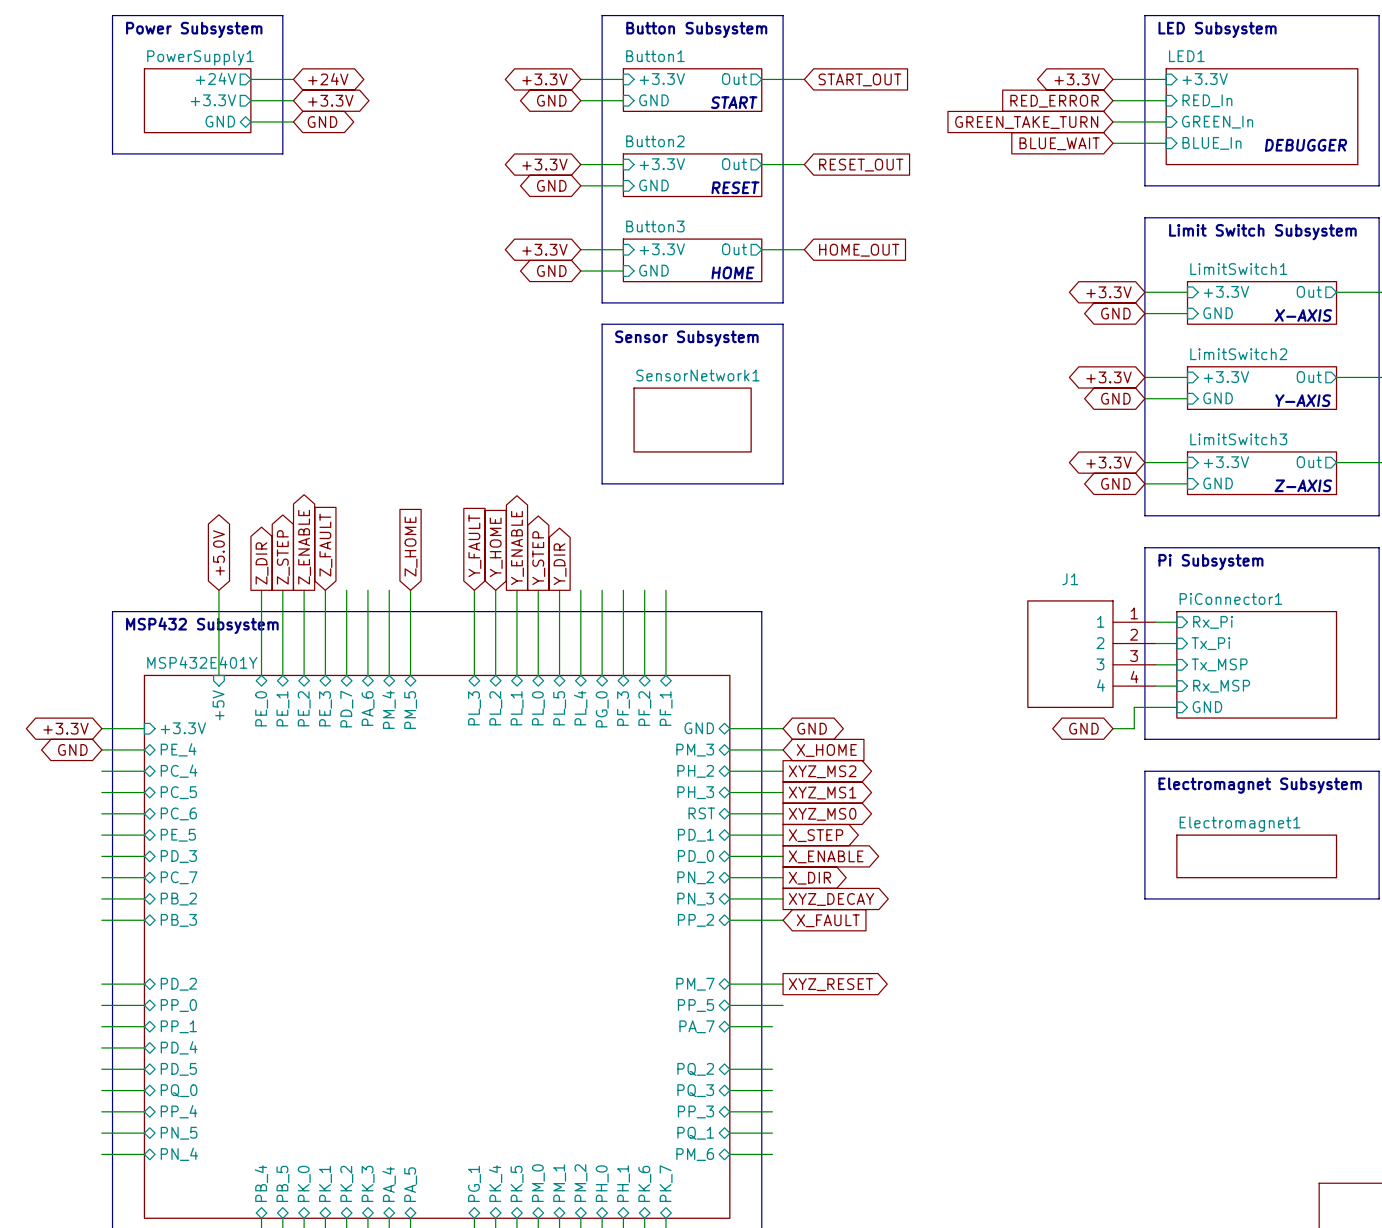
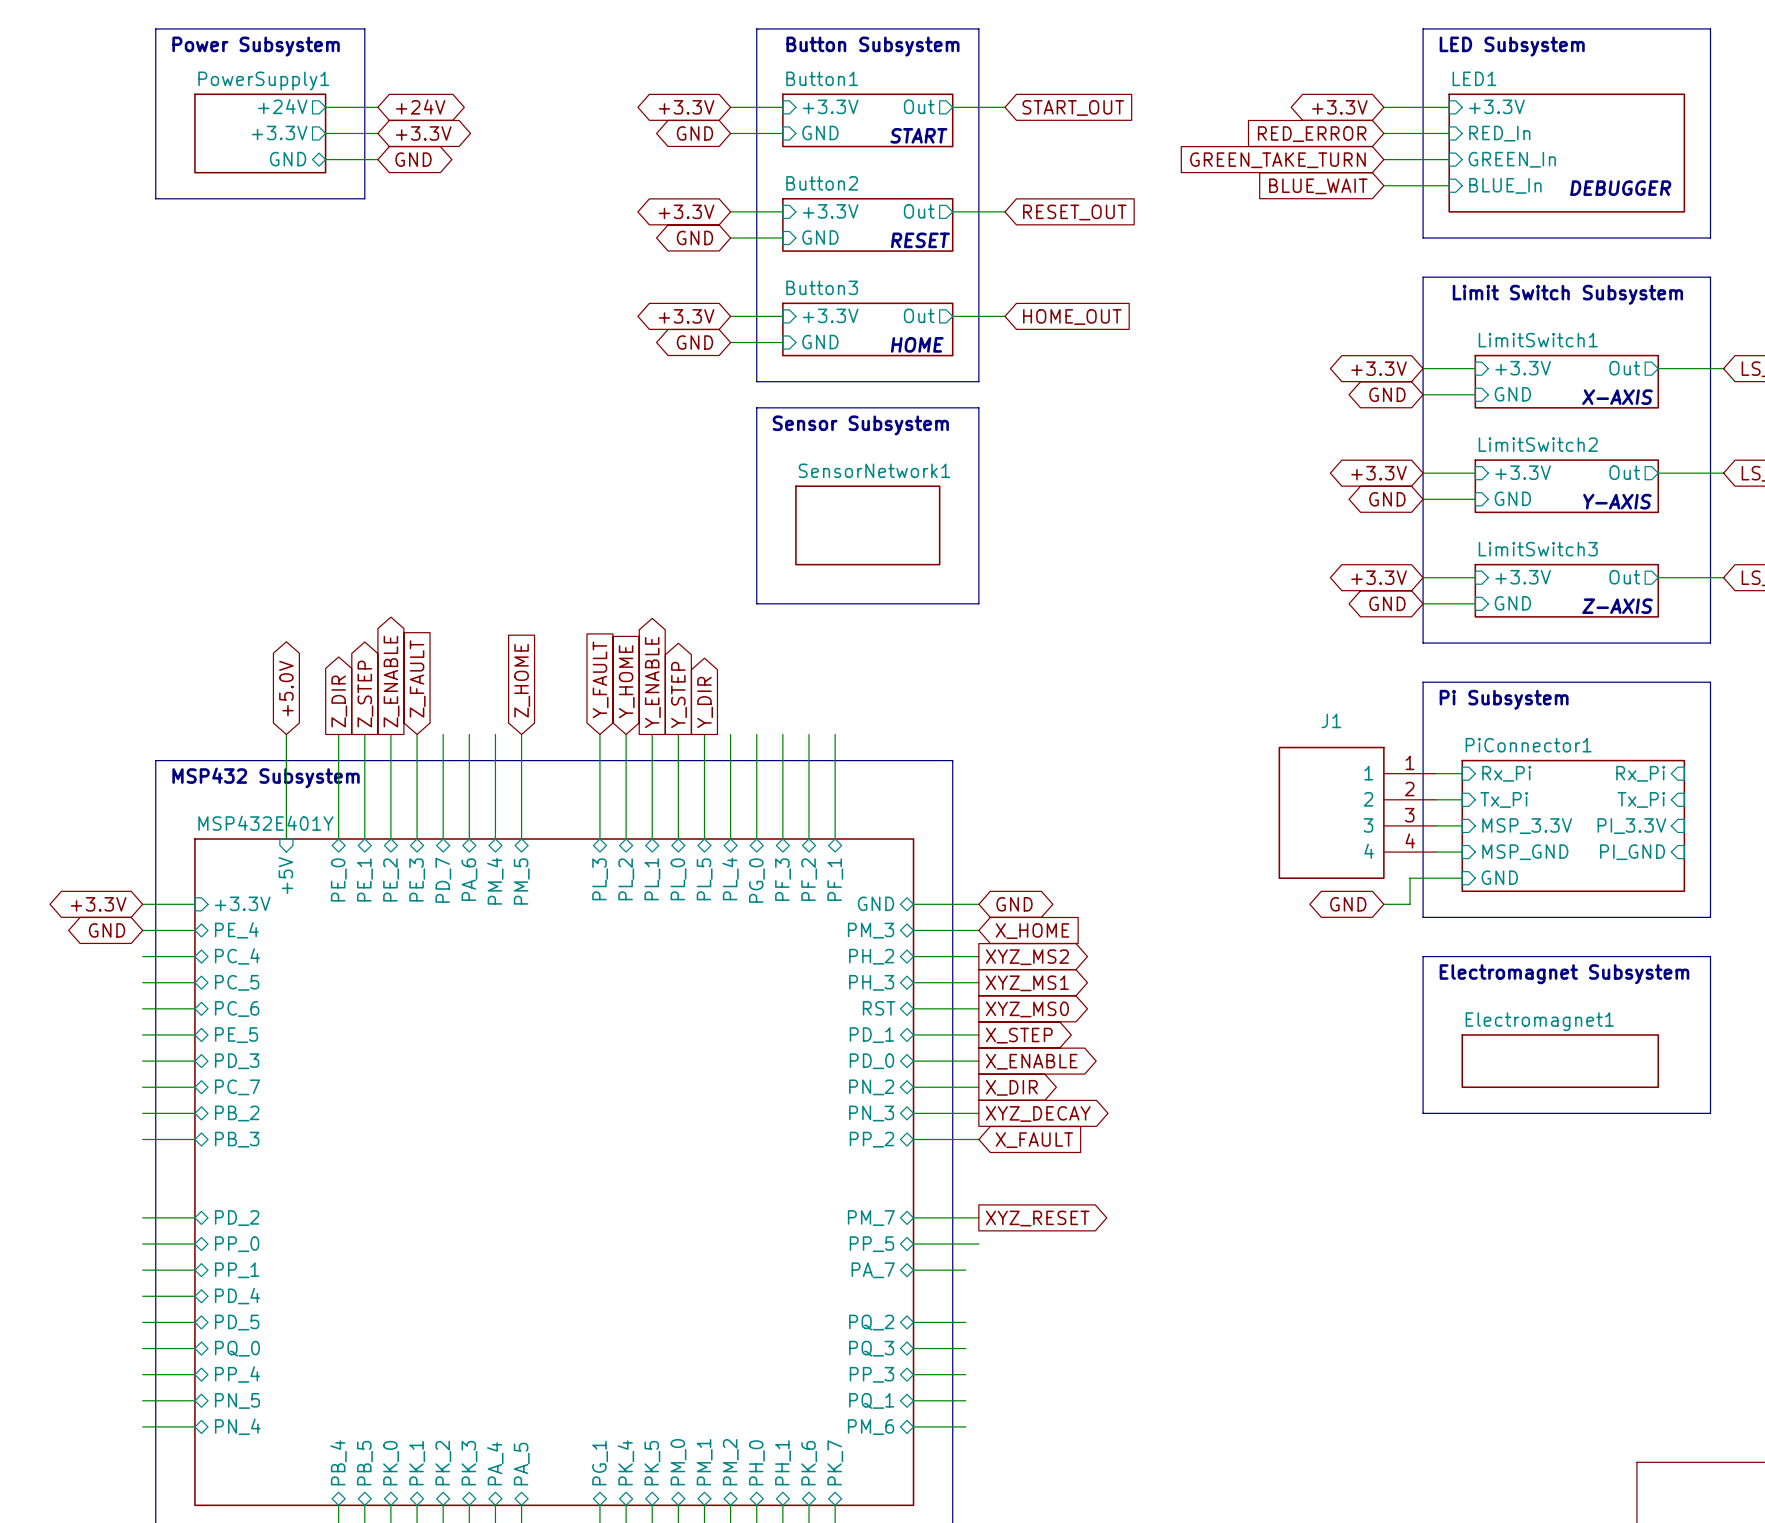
sheet PiConnector1 shape: [1176, 610, 1338, 719] -> [1461, 759, 1686, 893]
sheet pin: none -> Rx_Pi (1640, 773)
sheet pin: none -> Tx_Pi (1641, 799)
sheet pin: Tx_MSP (1219, 664) -> MSP_3.3V (1527, 826)
sheet pin: none -> PI_3.3V (1631, 826)
sheet pin: Rx_MSP (1221, 686) -> MSP_GND (1525, 852)
sheet pin: none -> PI_GND (1632, 852)

